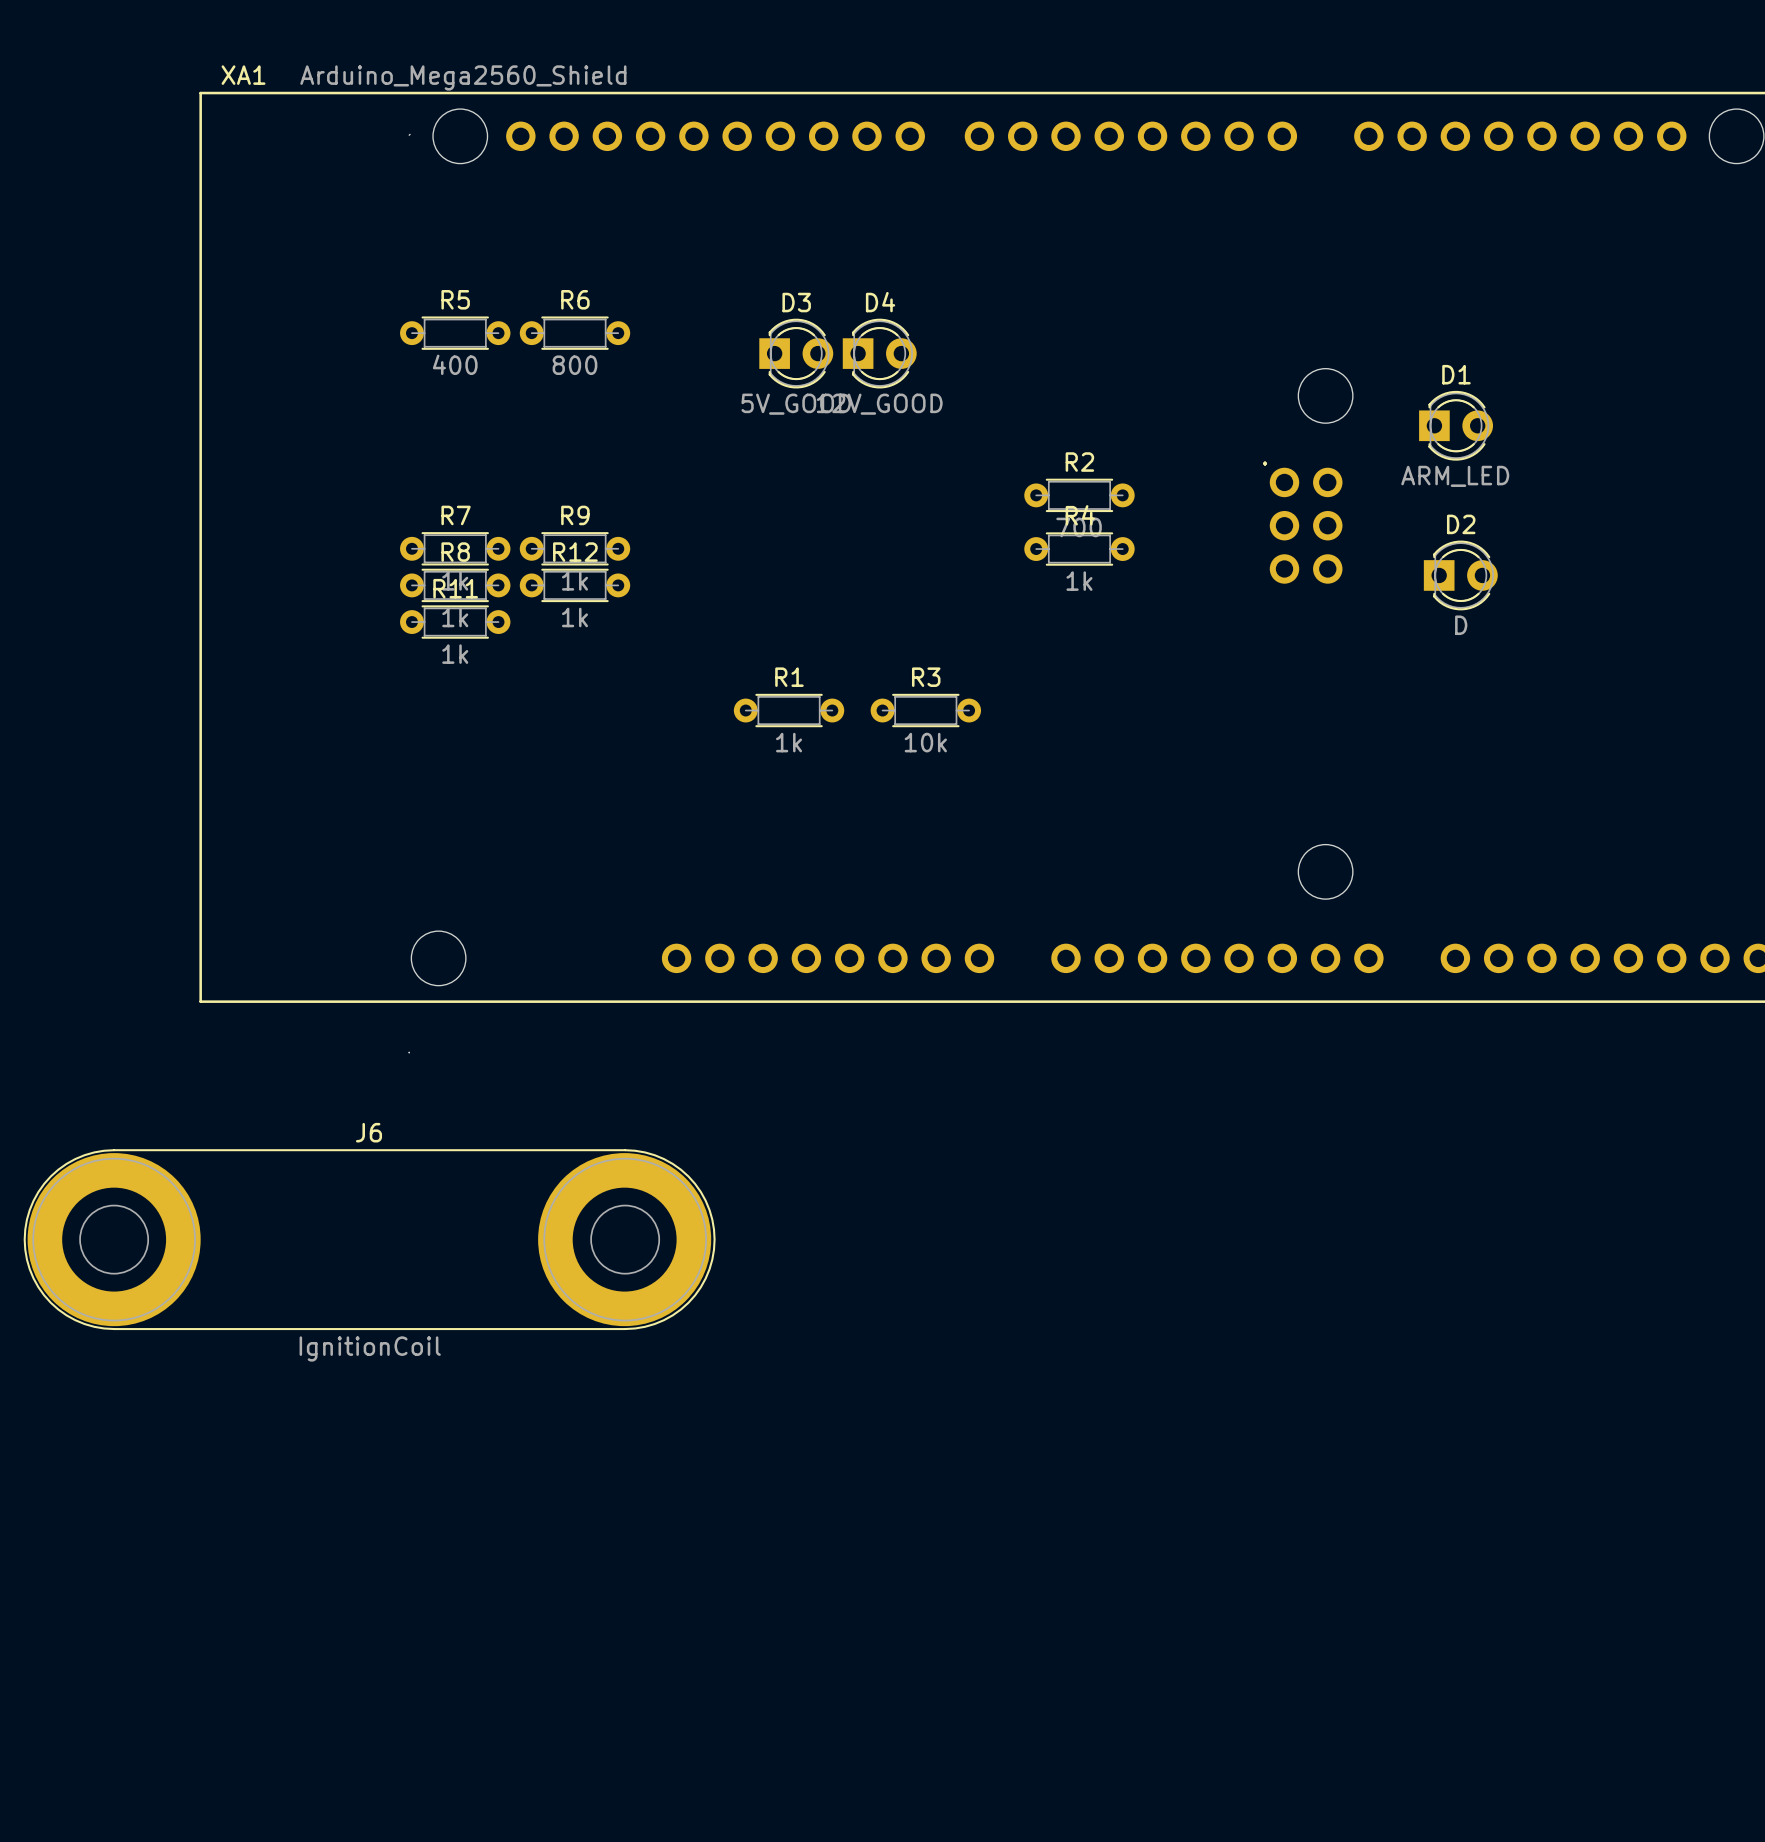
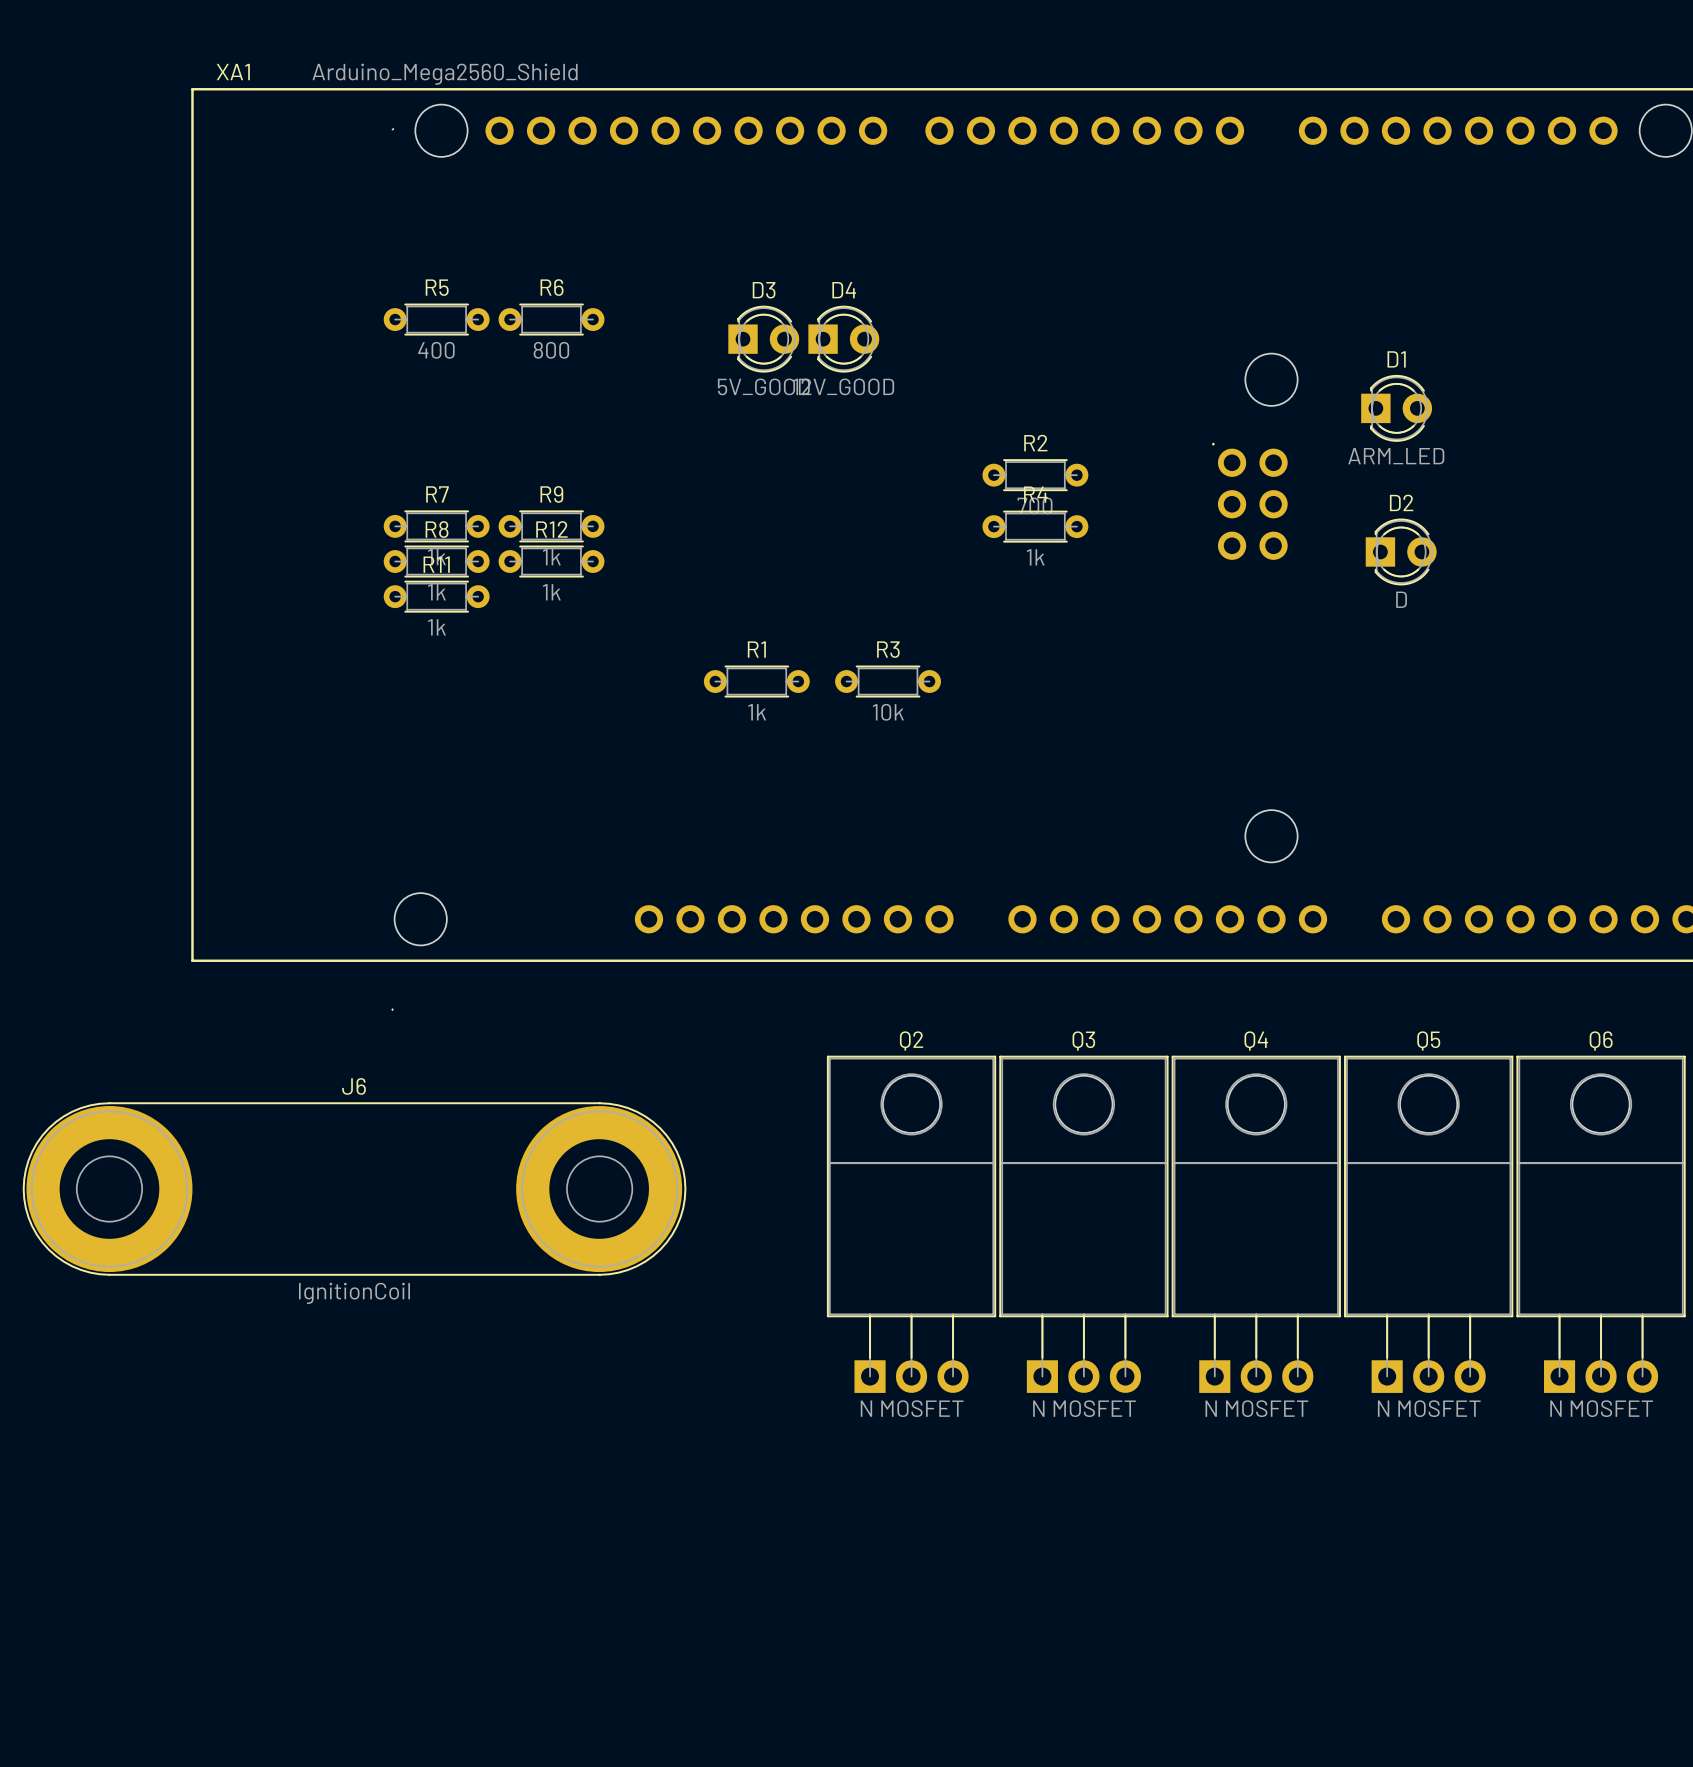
Q2: none -> N MOSFET (911, 1224)
Q3: none -> N MOSFET (1083, 1224)
Q4: none -> N MOSFET (1256, 1224)
Q5: none -> N MOSFET (1428, 1224)
Q6: none -> N MOSFET (1601, 1224)

